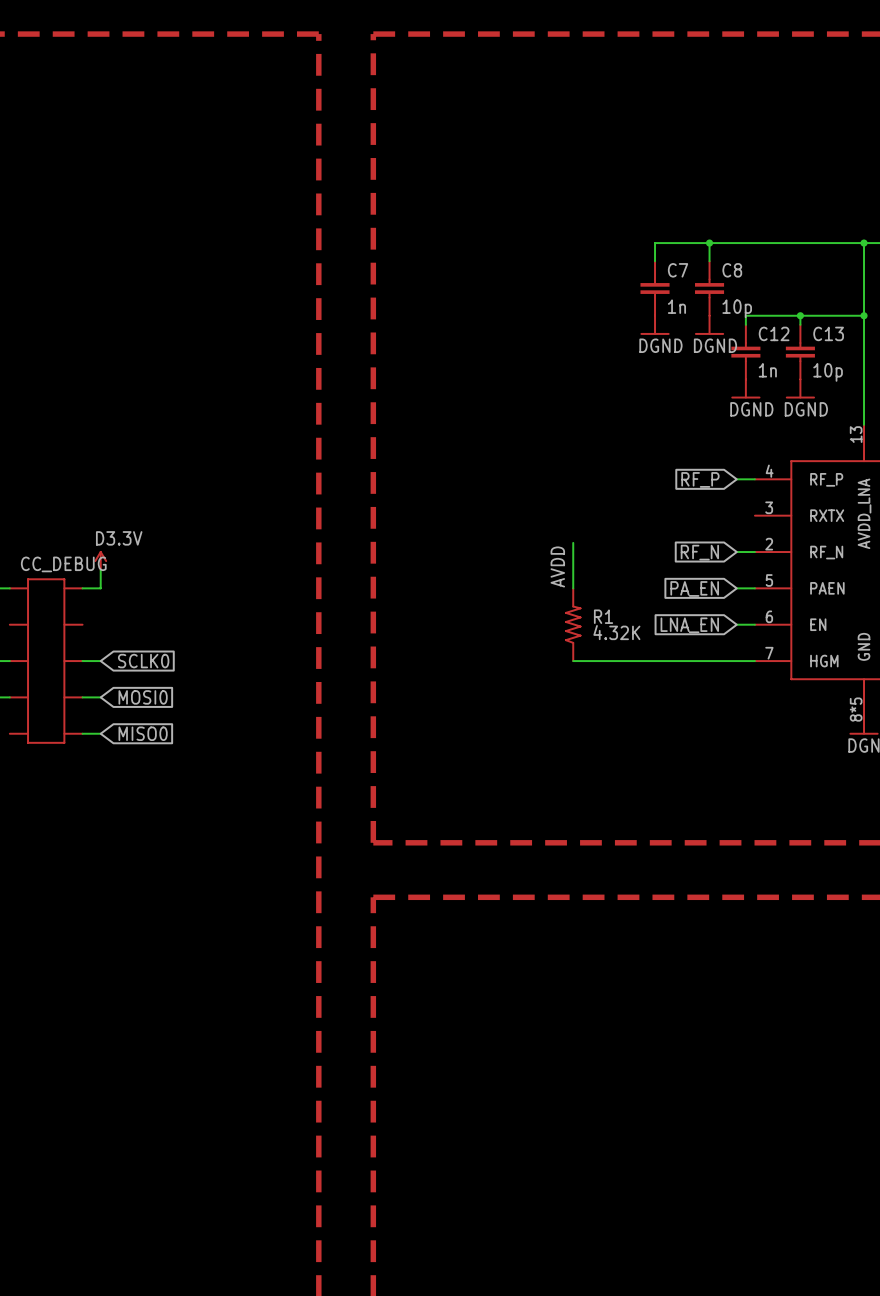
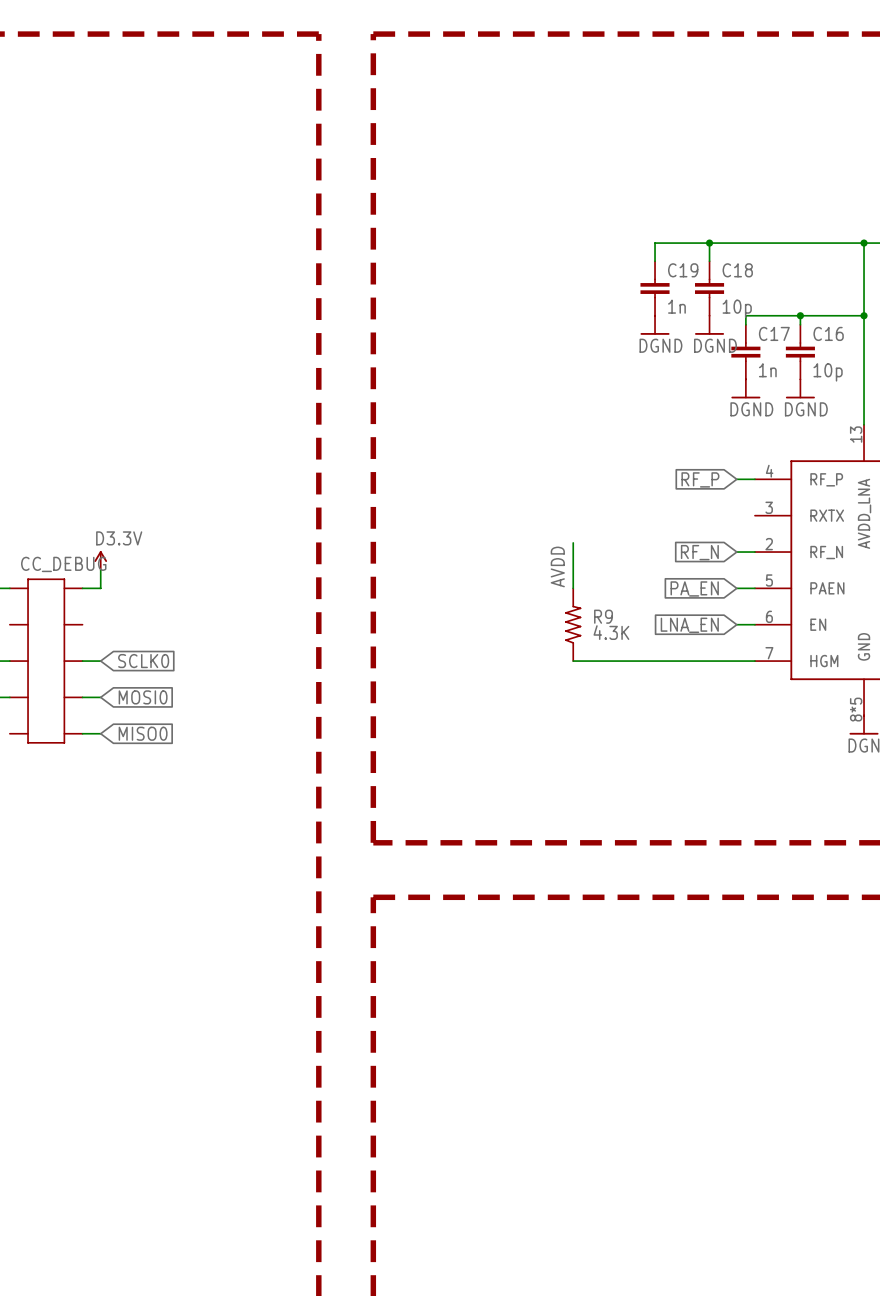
C7 name: C7 (678, 270) -> C19 (683, 270)
C8 name: C8 (732, 270) -> C18 (737, 270)
C12 name: C12 (774, 333) -> C17 (774, 333)
C13 name: C13 (828, 333) -> C16 (828, 333)
R1 name: R1 (603, 616) -> R9 (603, 616)
R1 value: 4.32K (616, 632) -> 4.3K (611, 632)

